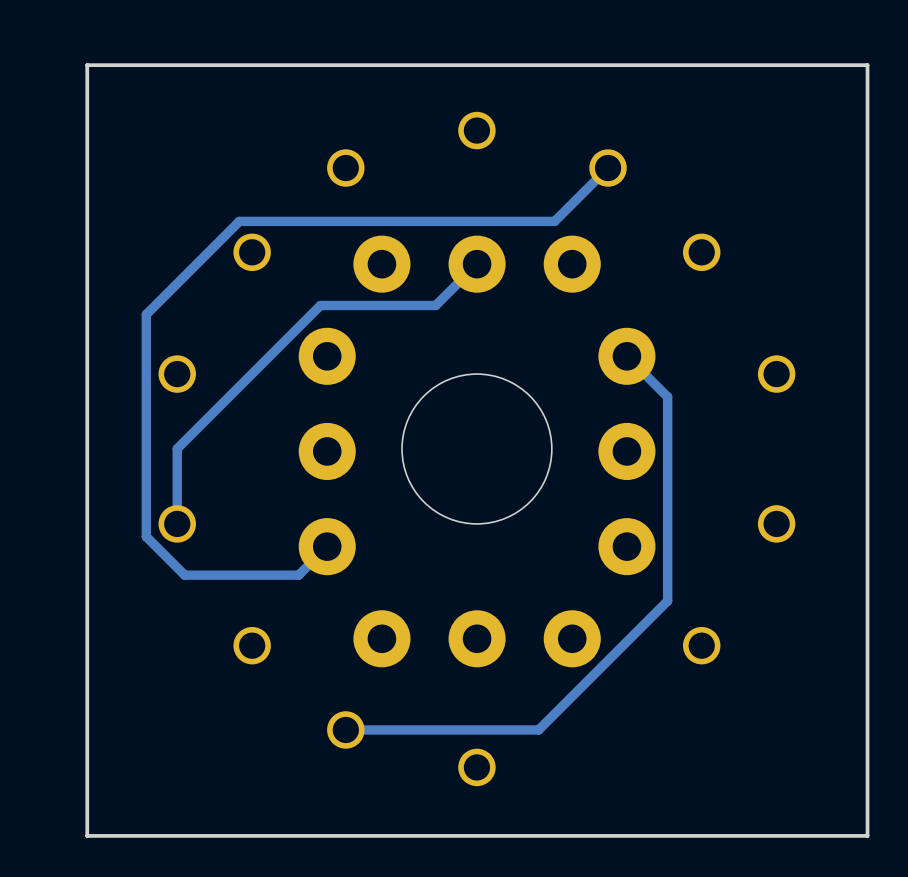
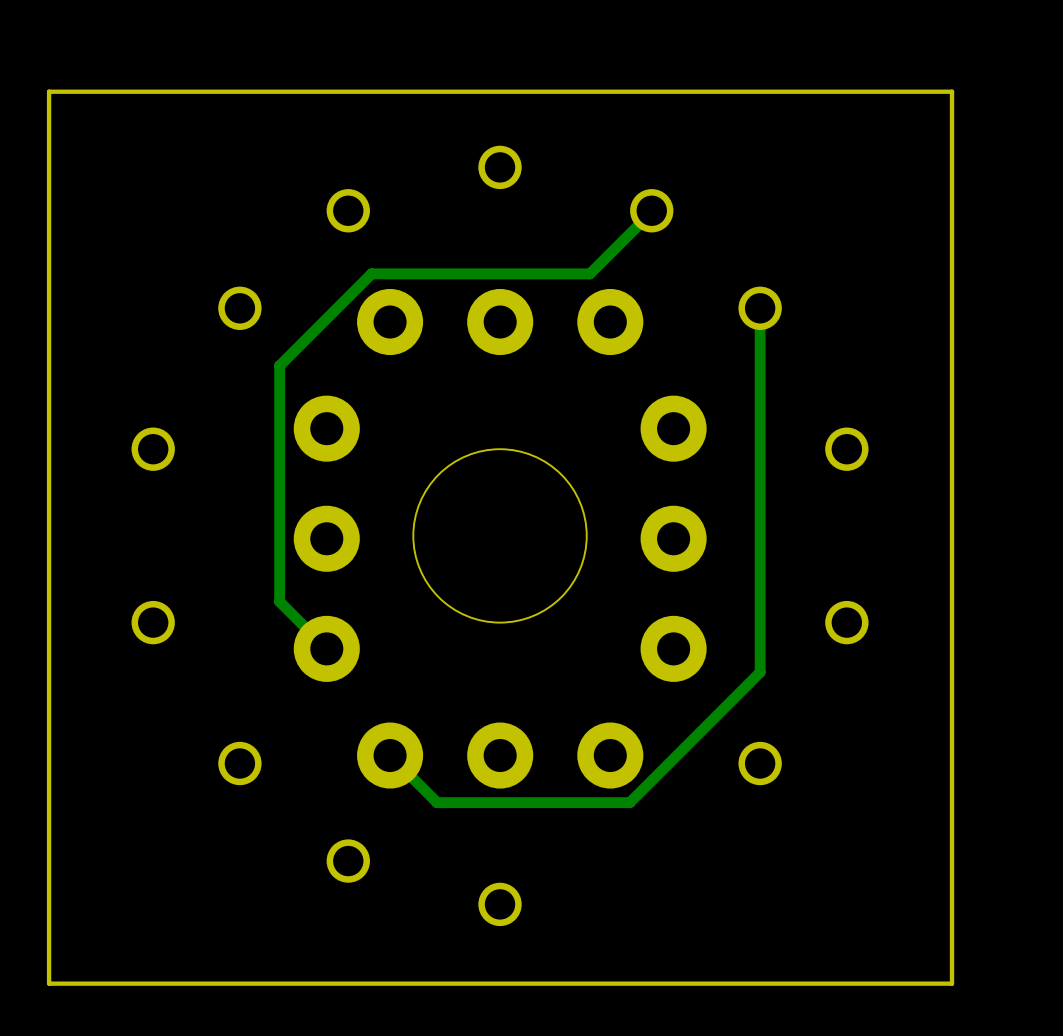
track: (608, 168) (554, 221) (239, 221) (146, 314) (146, 536) (184, 575) (298, 575) (327, 546) -> (651, 212) (589, 273) (371, 273) (279, 365) (279, 601) (326, 648)
track: (477, 264) (435, 305) (320, 305) (177, 448) (177, 523) -> none
track: (626, 356) (667, 397) (667, 600) -> (760, 309) (760, 672) (720, 711)
track: (589, 679) (538, 729) (345, 729) -> (629, 802) (437, 802) (390, 755)

